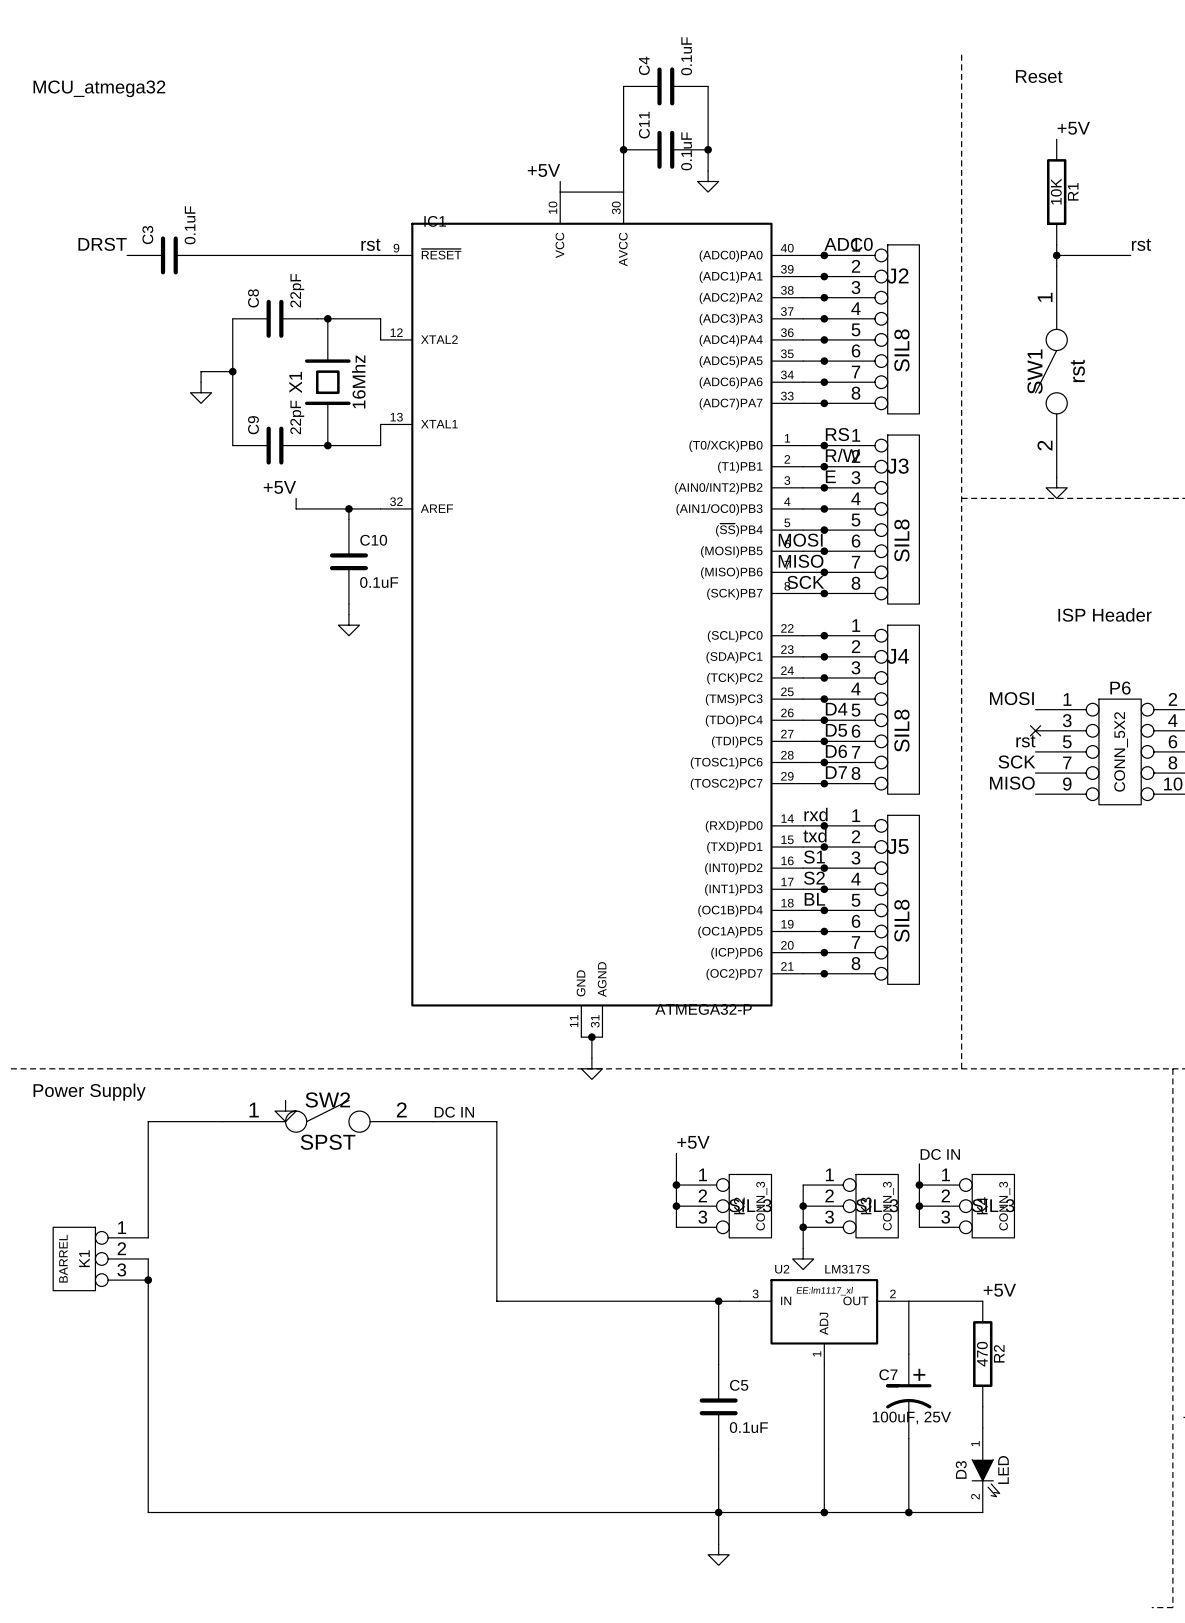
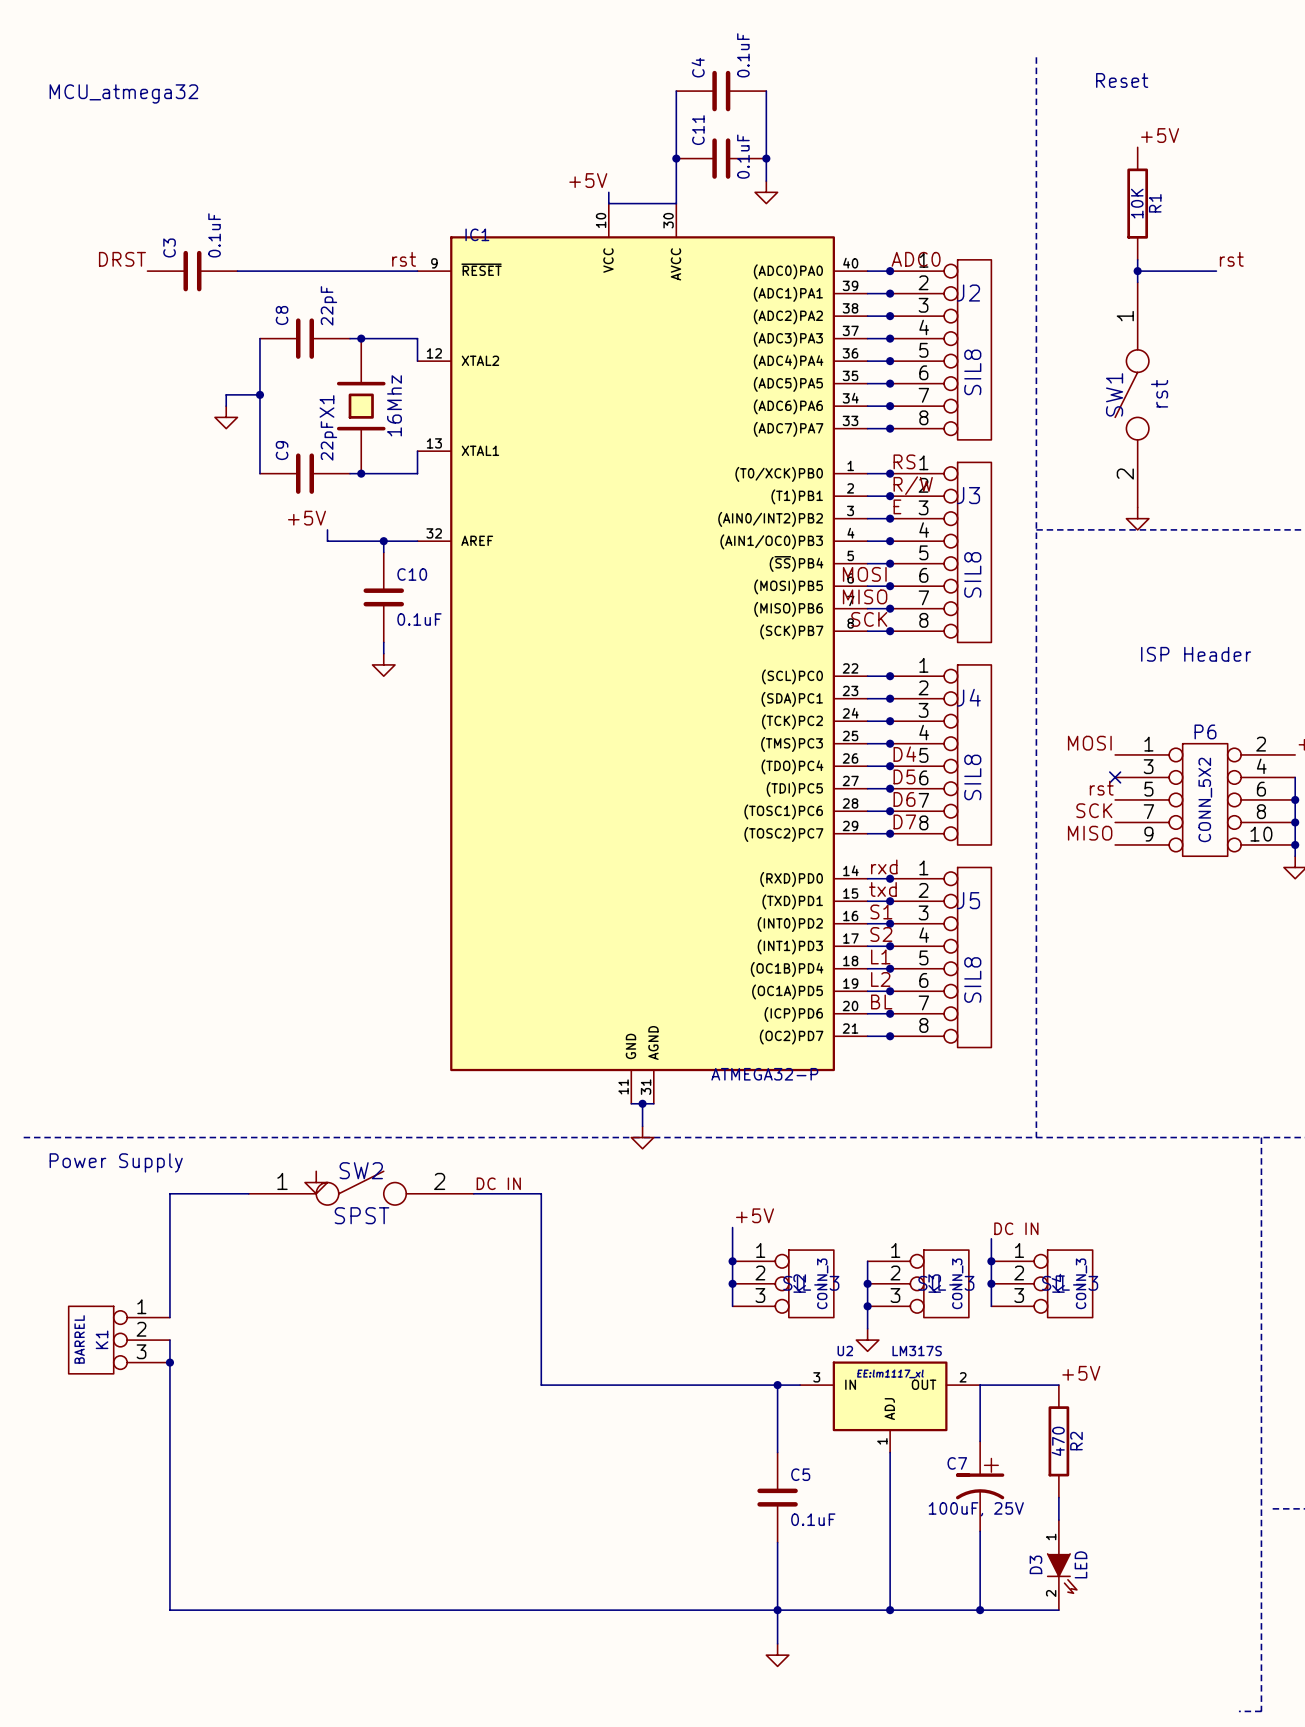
label: BL (814, 899) -> L1 (880, 956)
label: none -> L2 (880, 979)
label: none -> BL (881, 1001)

